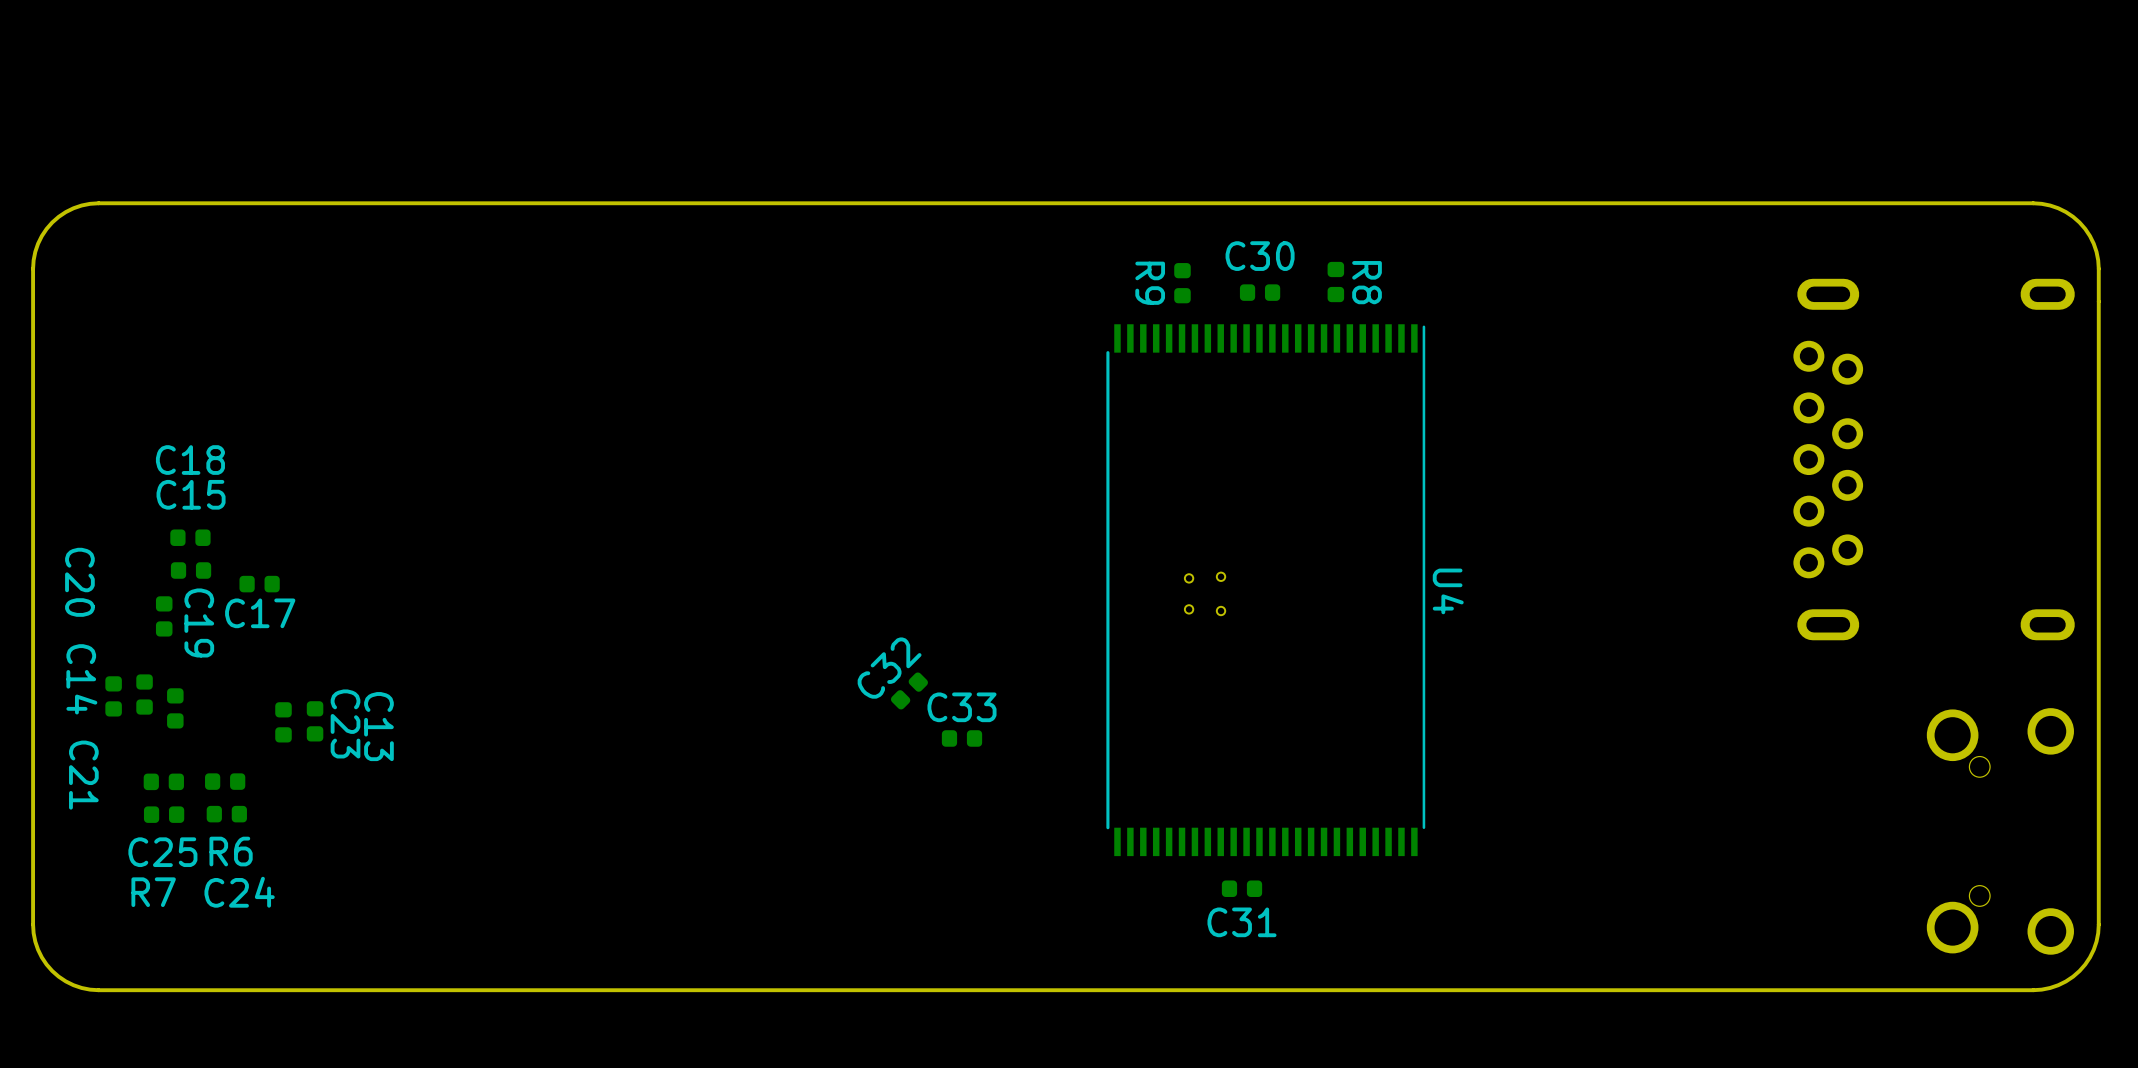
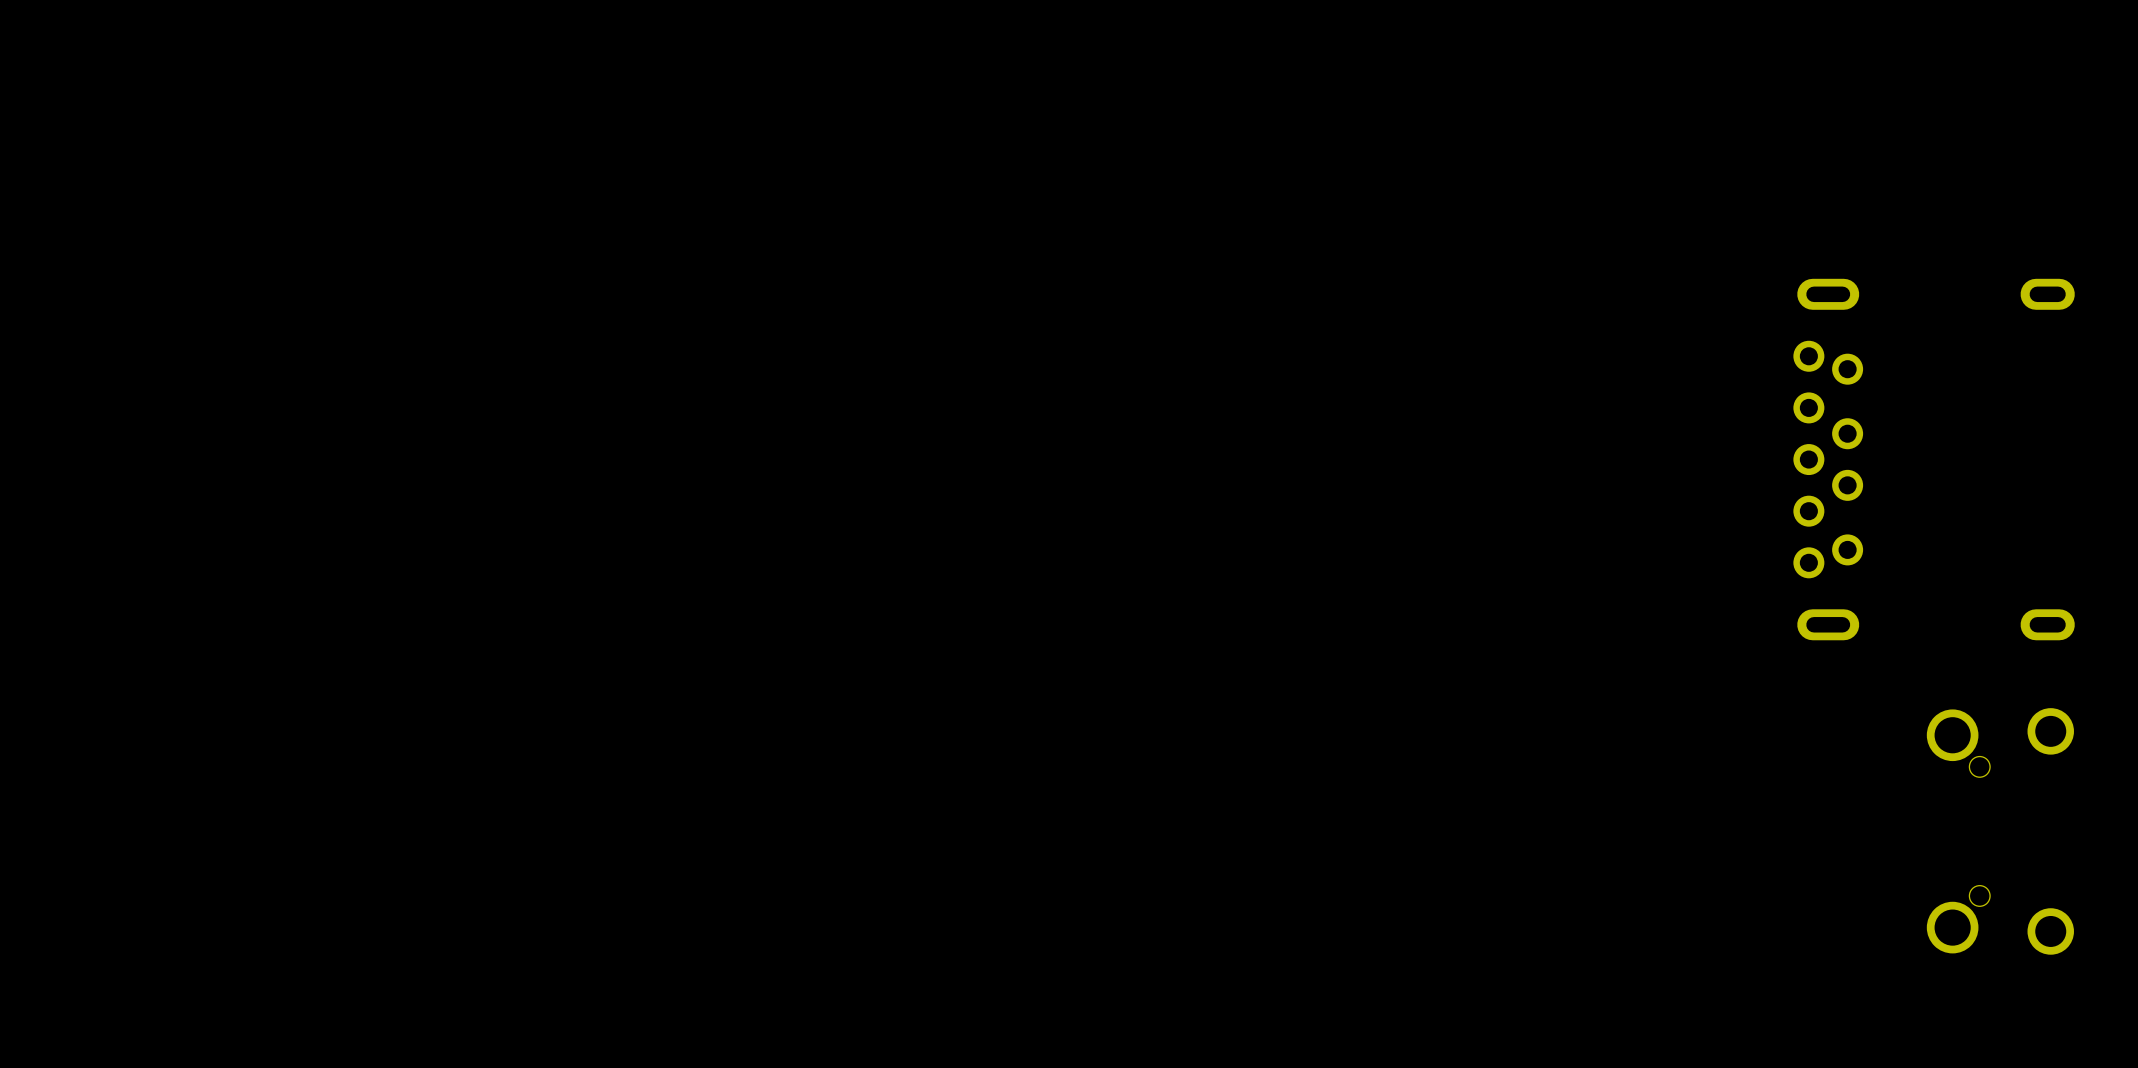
board edge: (2033, 203) (98, 203) (73, 208) (58, 216) (41, 236) (35, 251) (33, 268) (33, 924) (38, 949) (46, 964) (58, 976) (81, 987) (98, 990) (2033, 990) (2058, 985) (2073, 976) (2085, 964) (2096, 941) (2098, 924) (2098, 268) (2093, 243) (2079, 222) (2058, 208) (2033, 203) -> none
R8: (1335, 282) -> none
R9: (1182, 283) -> none
C30: (1260, 292) -> none
C18: (190, 537) -> none
C15: (191, 570) -> none
C17: (259, 584) -> none
U4: (1265, 590) -> none
part: (1205, 593) -> none
C19: (164, 616) -> none
C32: (909, 690) -> none
C14: (144, 694) -> none
C20: (113, 696) -> none
C21: (175, 708) -> none
C13: (315, 721) -> none
C23: (283, 722) -> none
C33: (962, 738) -> none
C25: (163, 781) -> none
R6: (225, 781) -> none
R7: (164, 814) -> none
C24: (226, 814) -> none
C31: (1241, 888) -> none

